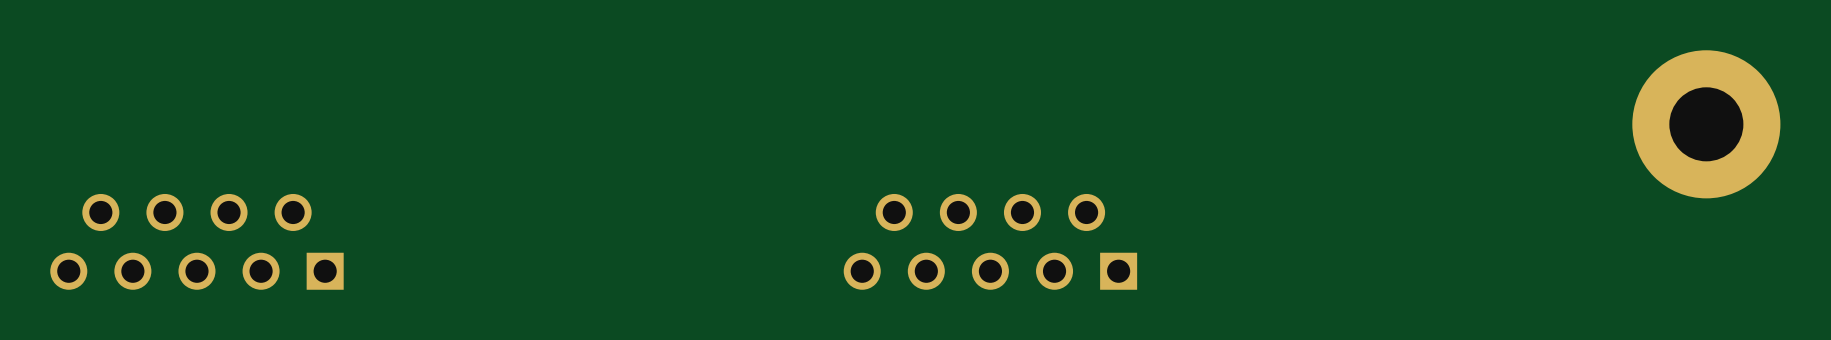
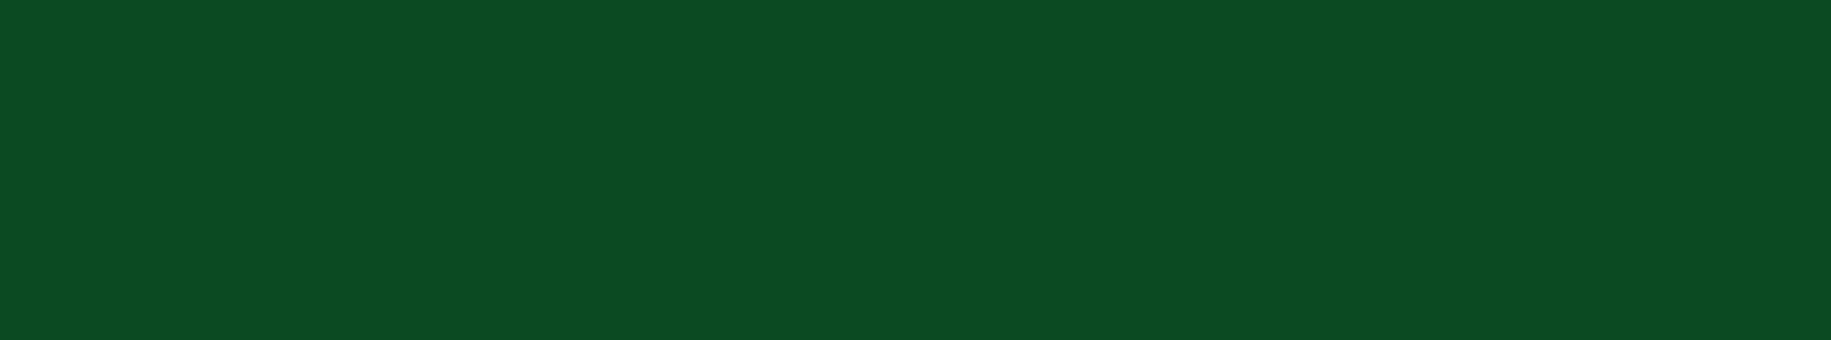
part: (1706, 124) -> none
part: (196, 241) -> none
part: (990, 241) -> none

